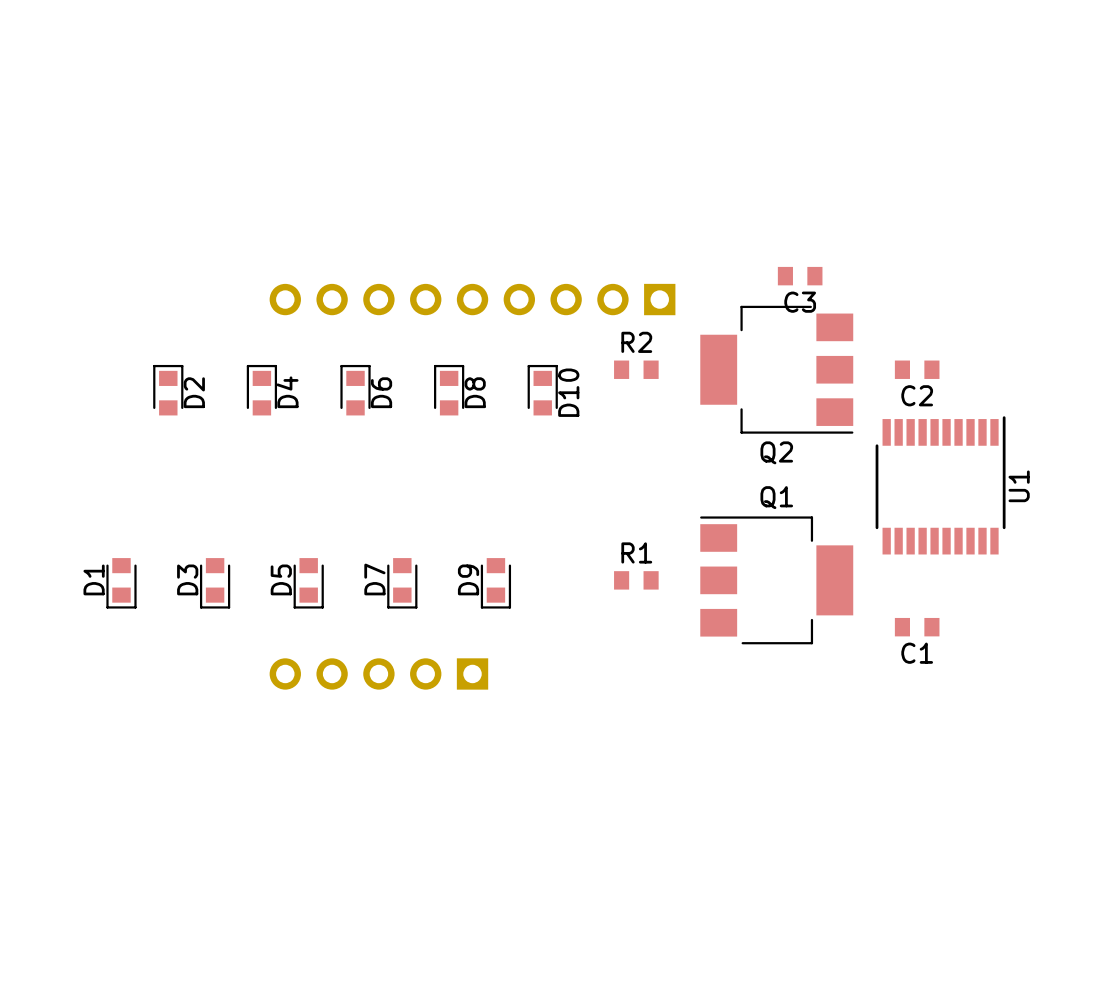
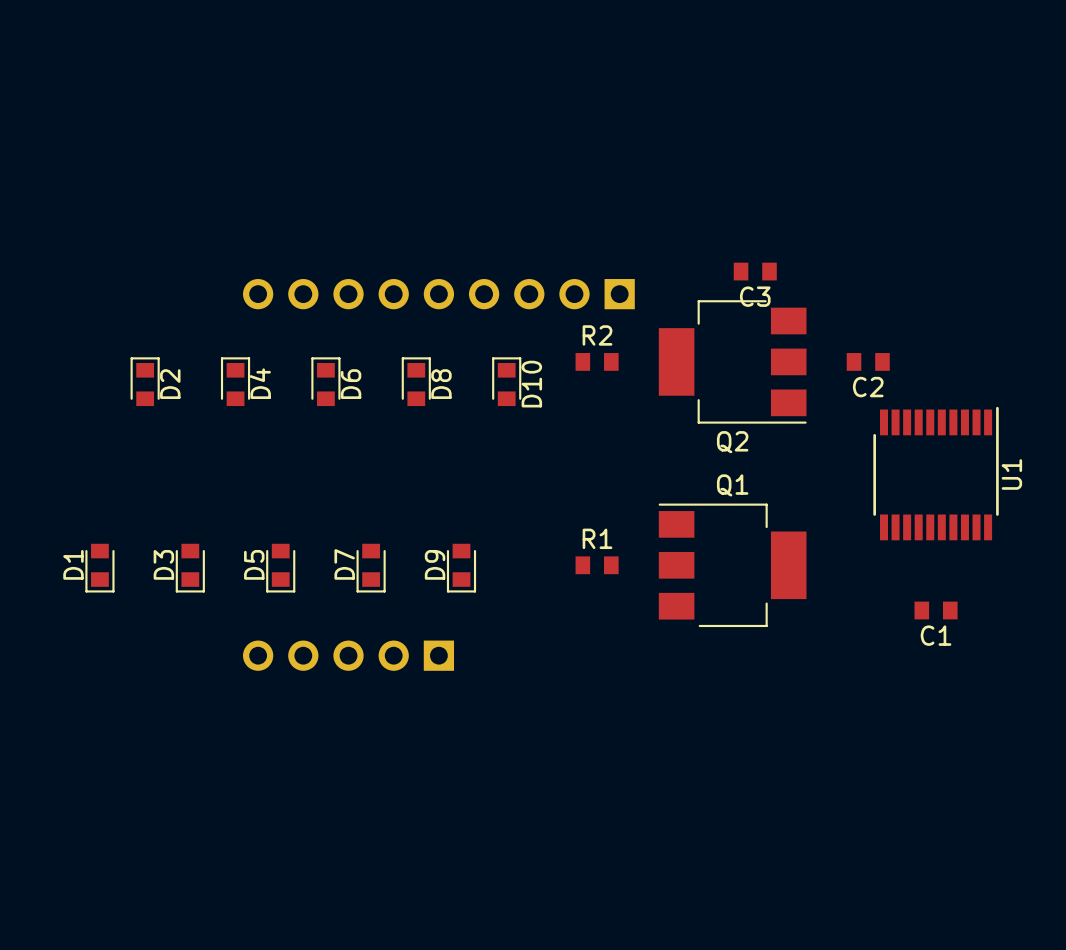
U1 position: (940, 485) -> (936, 473)
C1 position: (917, 627) -> (936, 610)

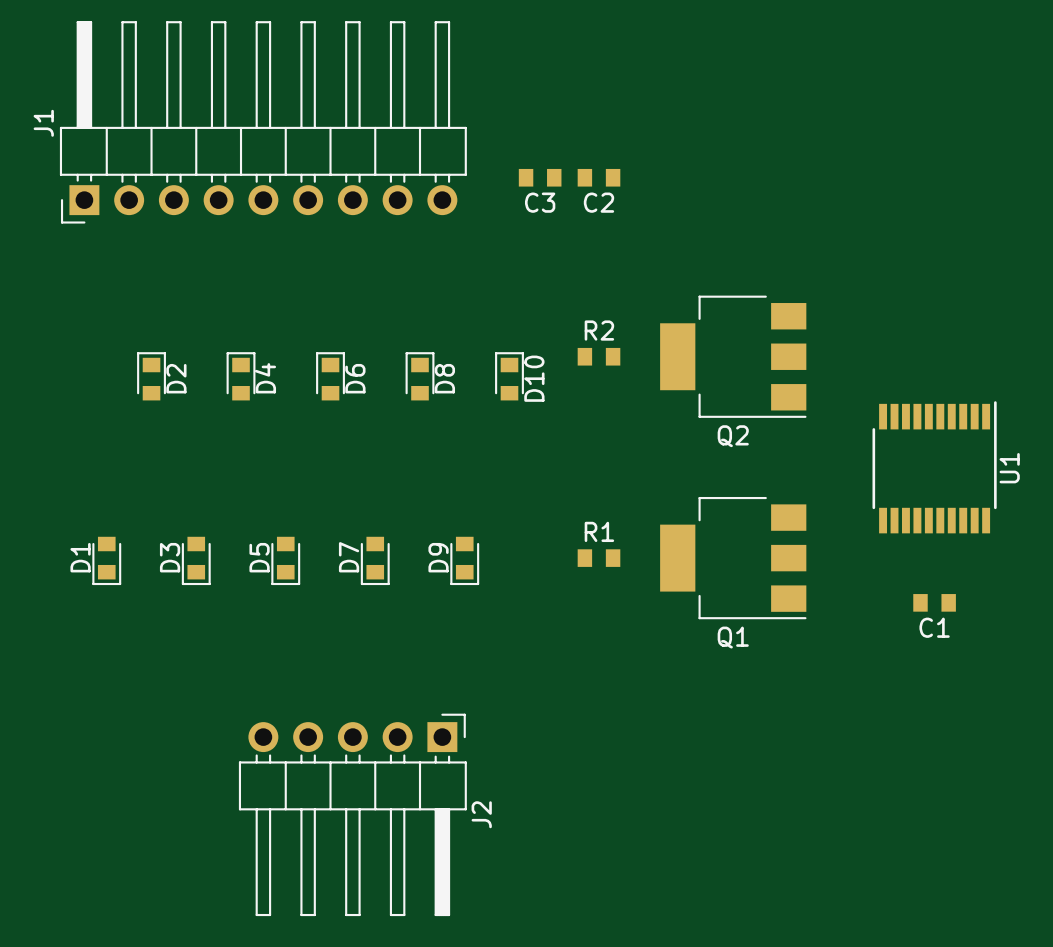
C3 position: (755, 271) -> (540, 177)
J1 side: bottom (438, 294) -> top (263, 122)
C2 position: (868, 361) -> (598, 177)
Q1 rotation: 0° (732, 565) -> 180° (733, 558)
J2 side: bottom (348, 655) -> top (352, 814)

